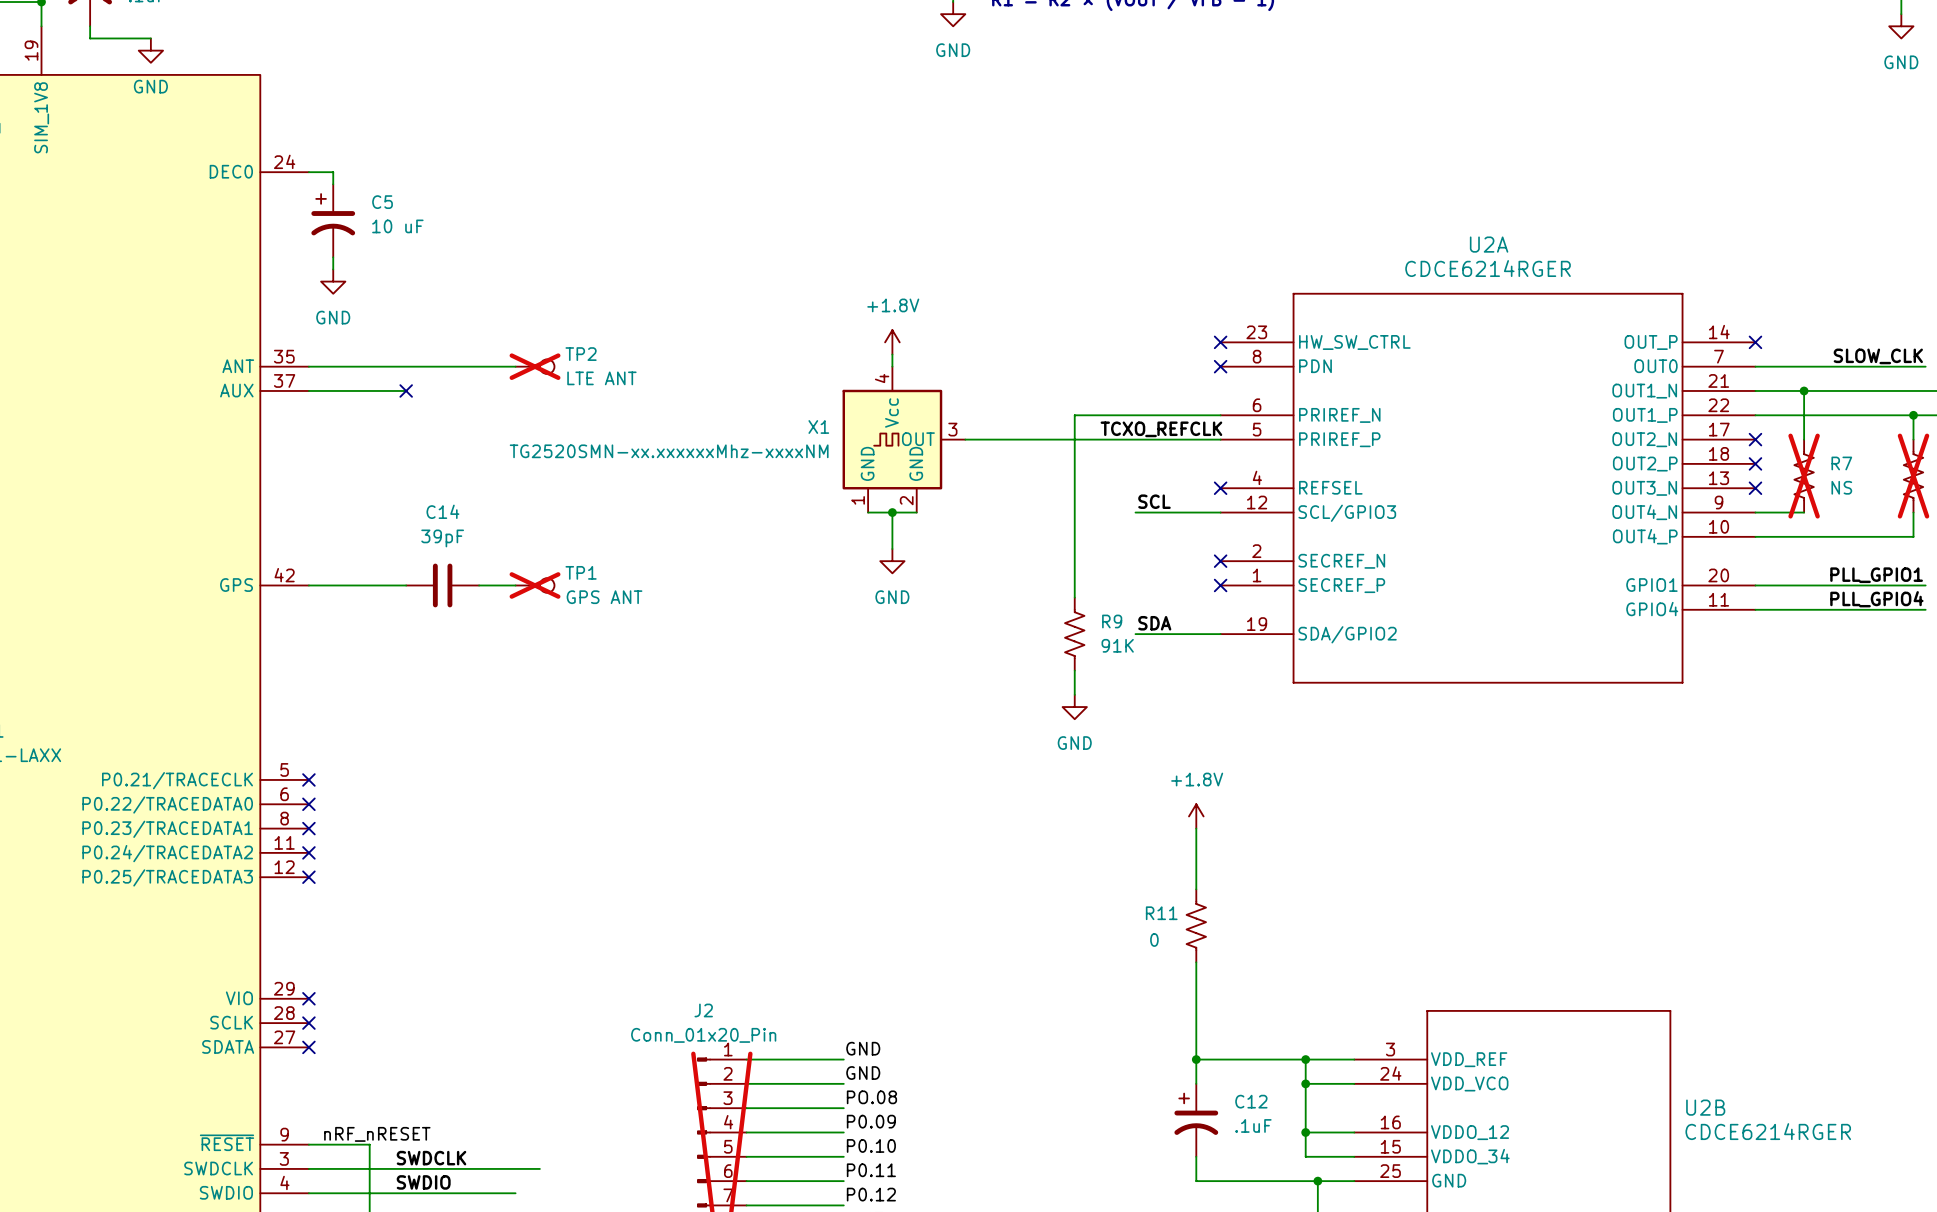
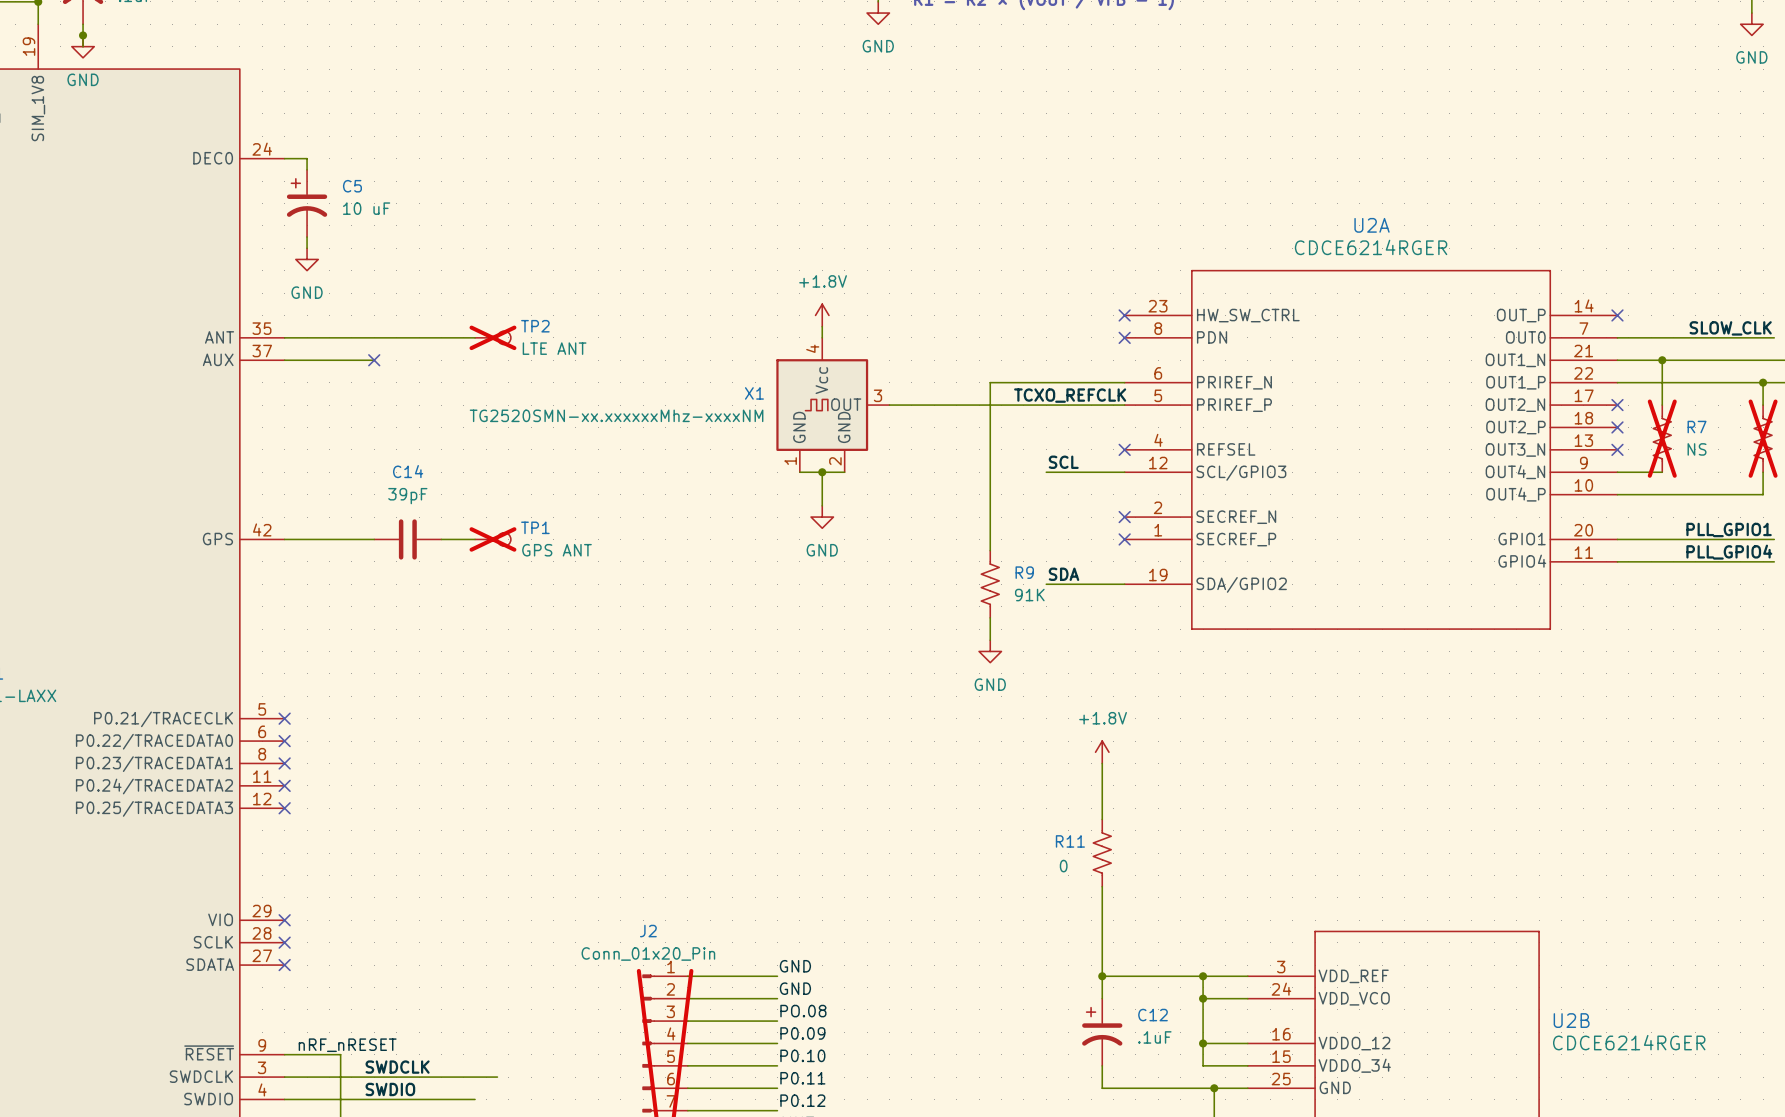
wire: (90, 38) (150, 38) -> (83, 35) (83, 46)
junction: none -> (83, 35)
power symbol position: GND (150, 50) -> GND (83, 46)

